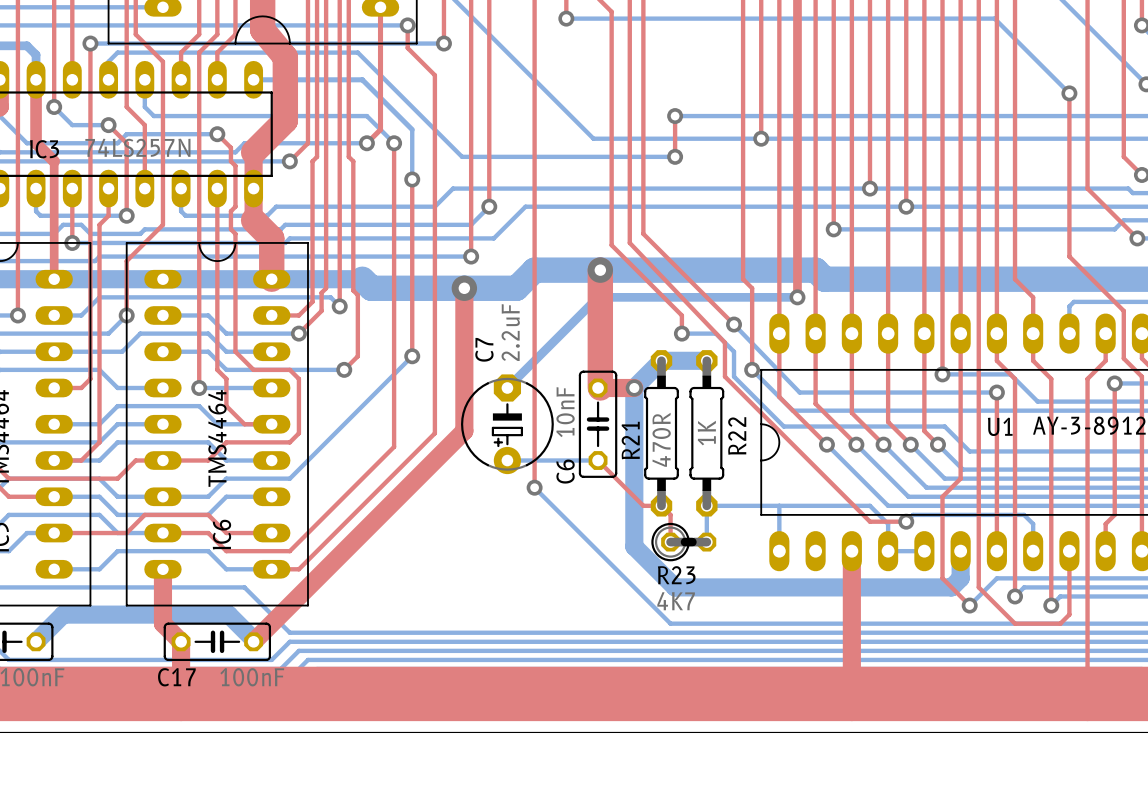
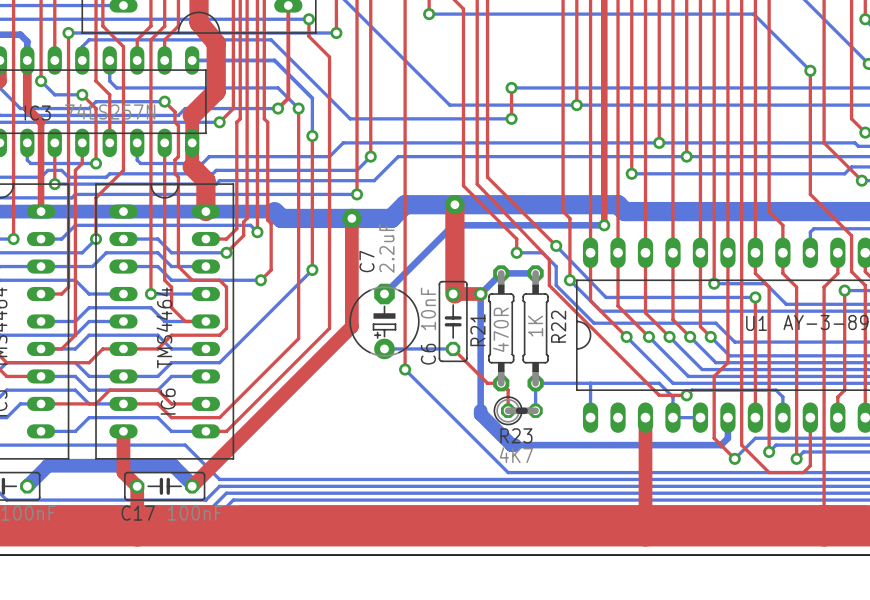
bottom track width: thick (706, 360) (661, 360) (634, 388) (634, 542) -> thin (535, 273) (501, 273) (480, 294) (480, 410)
bottom track width: thick (960, 551) (960, 578) (951, 587) (679, 587) -> thin (727, 417) (727, 438) (721, 445) (515, 445)

